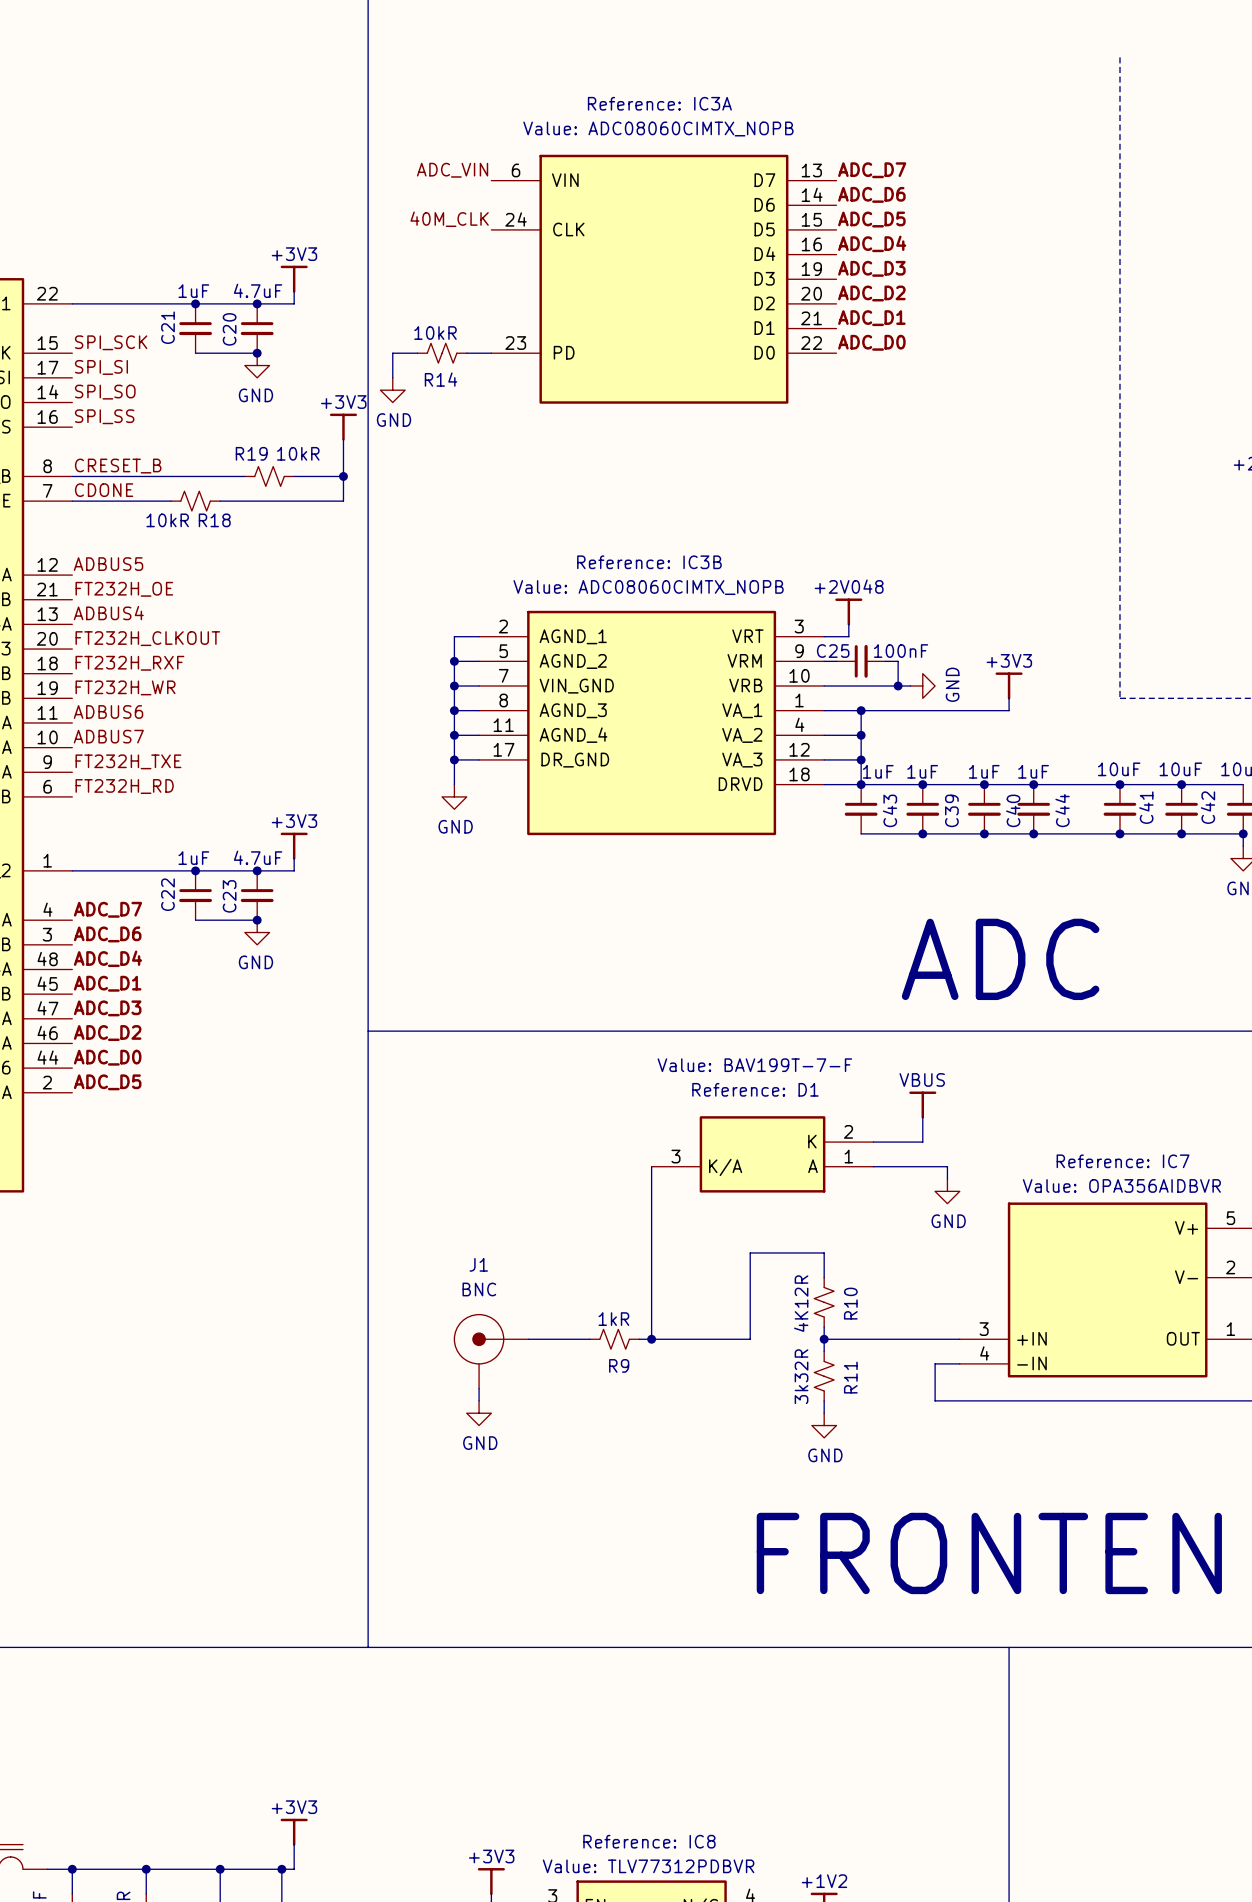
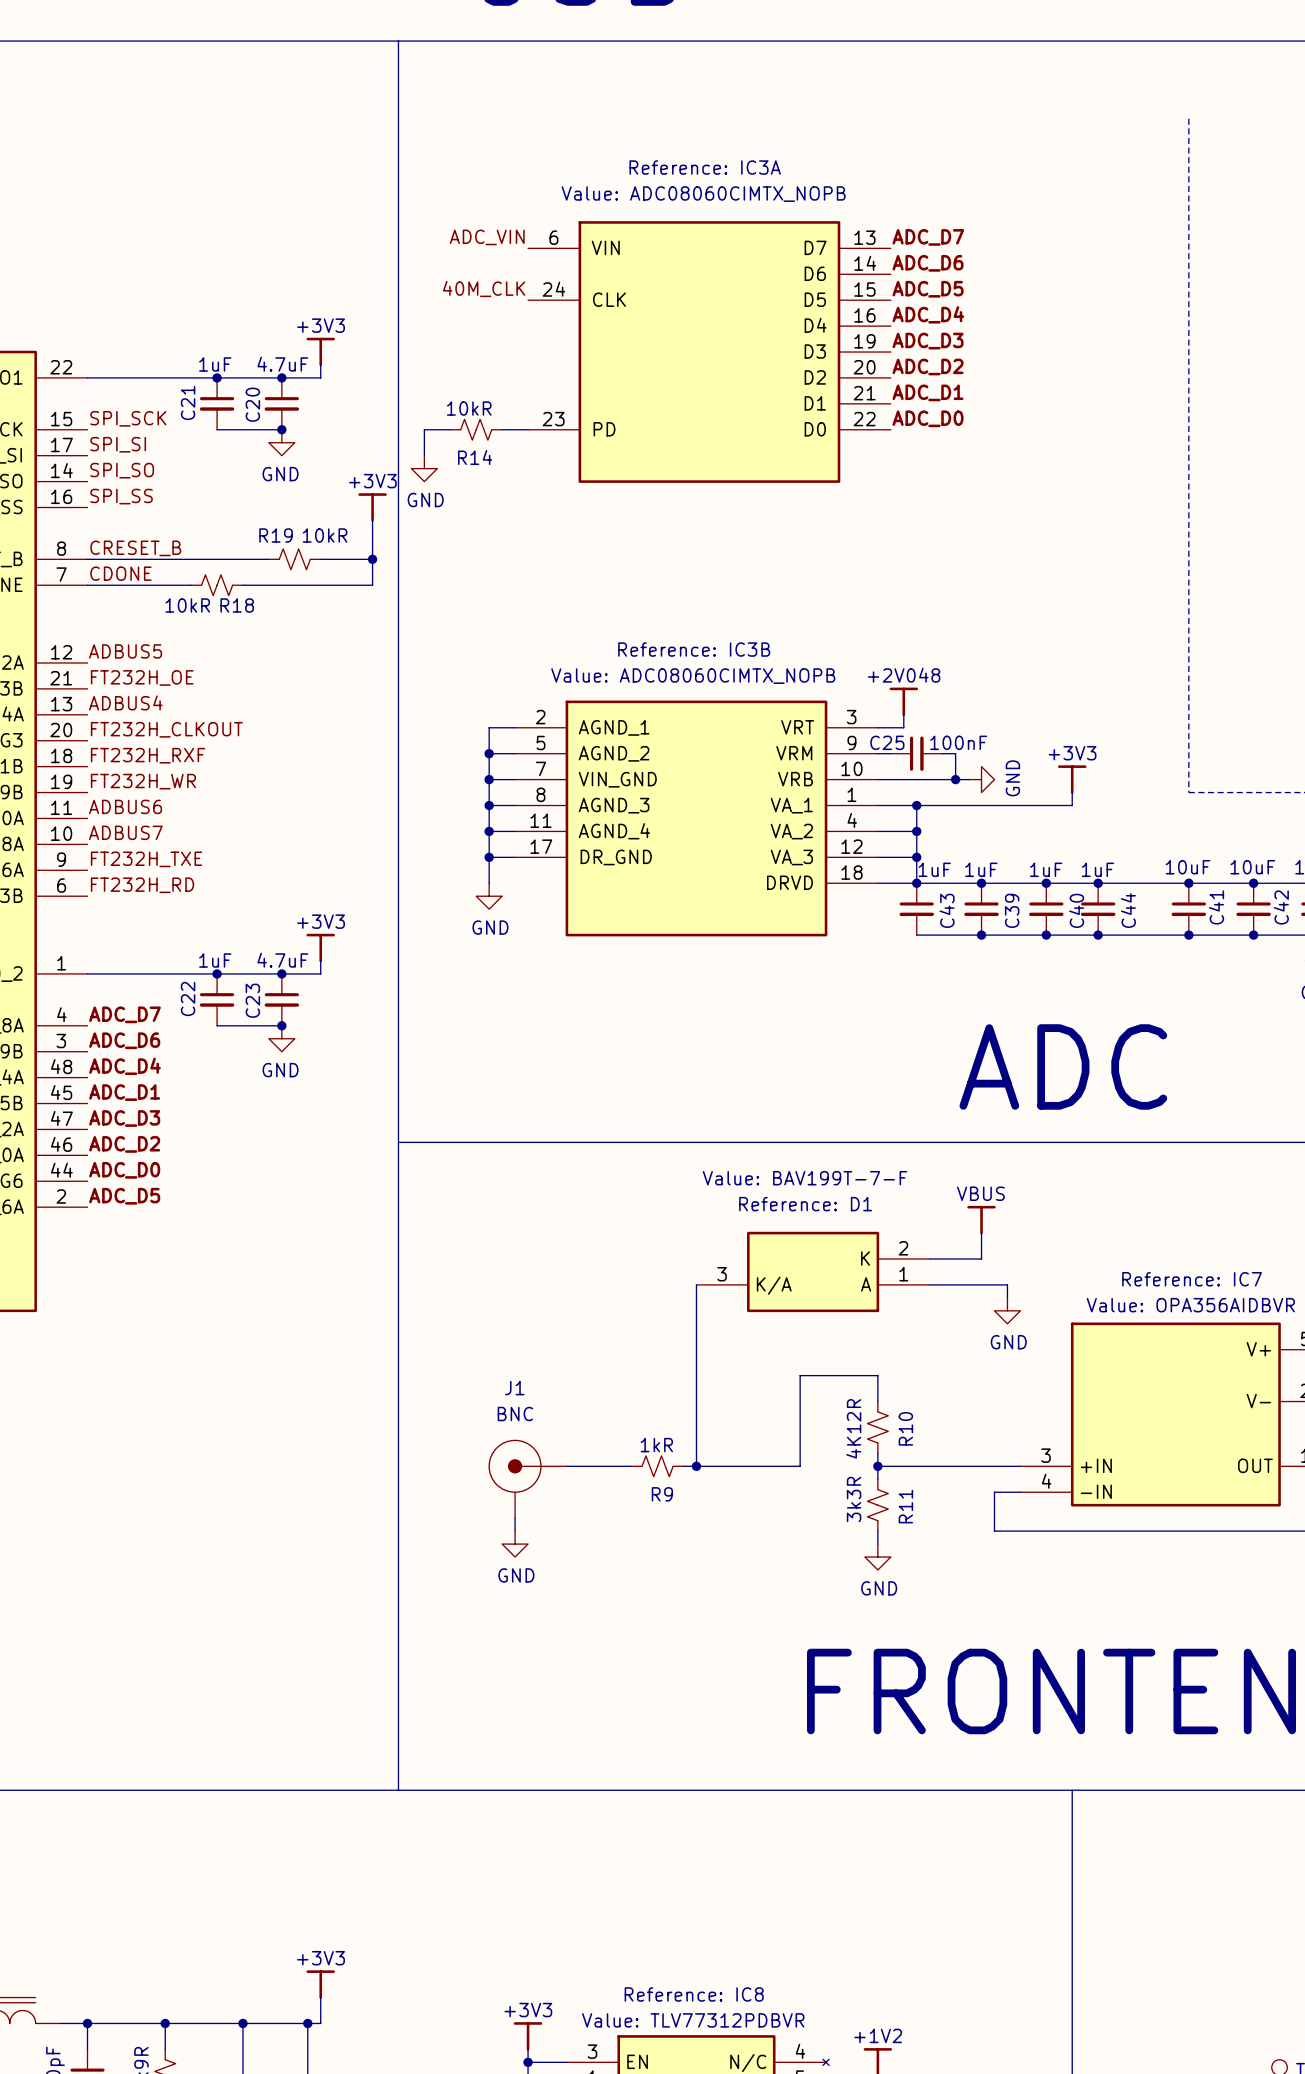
R11 value: 3k32R (801, 1376) -> 3k3R (854, 1499)

